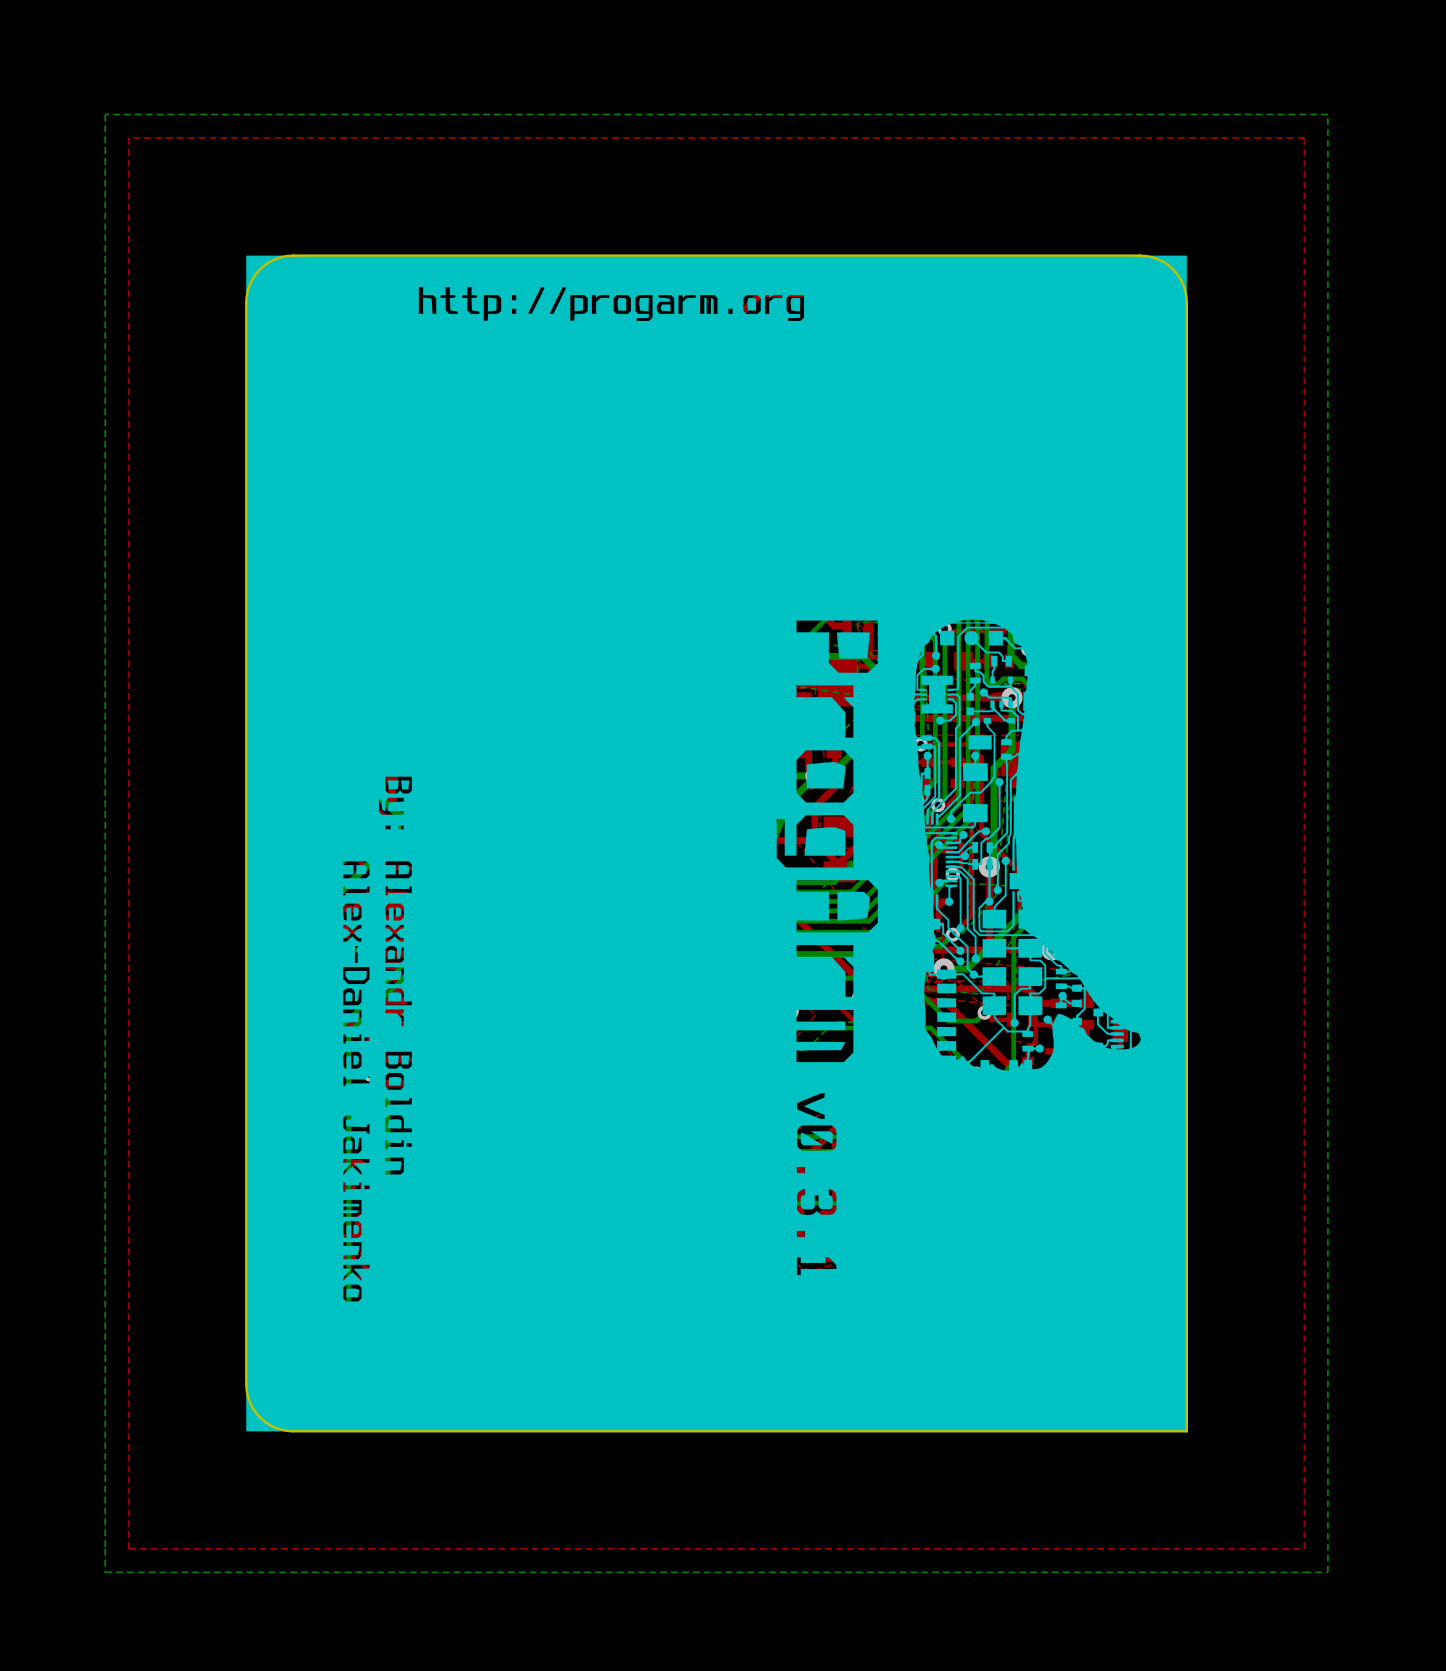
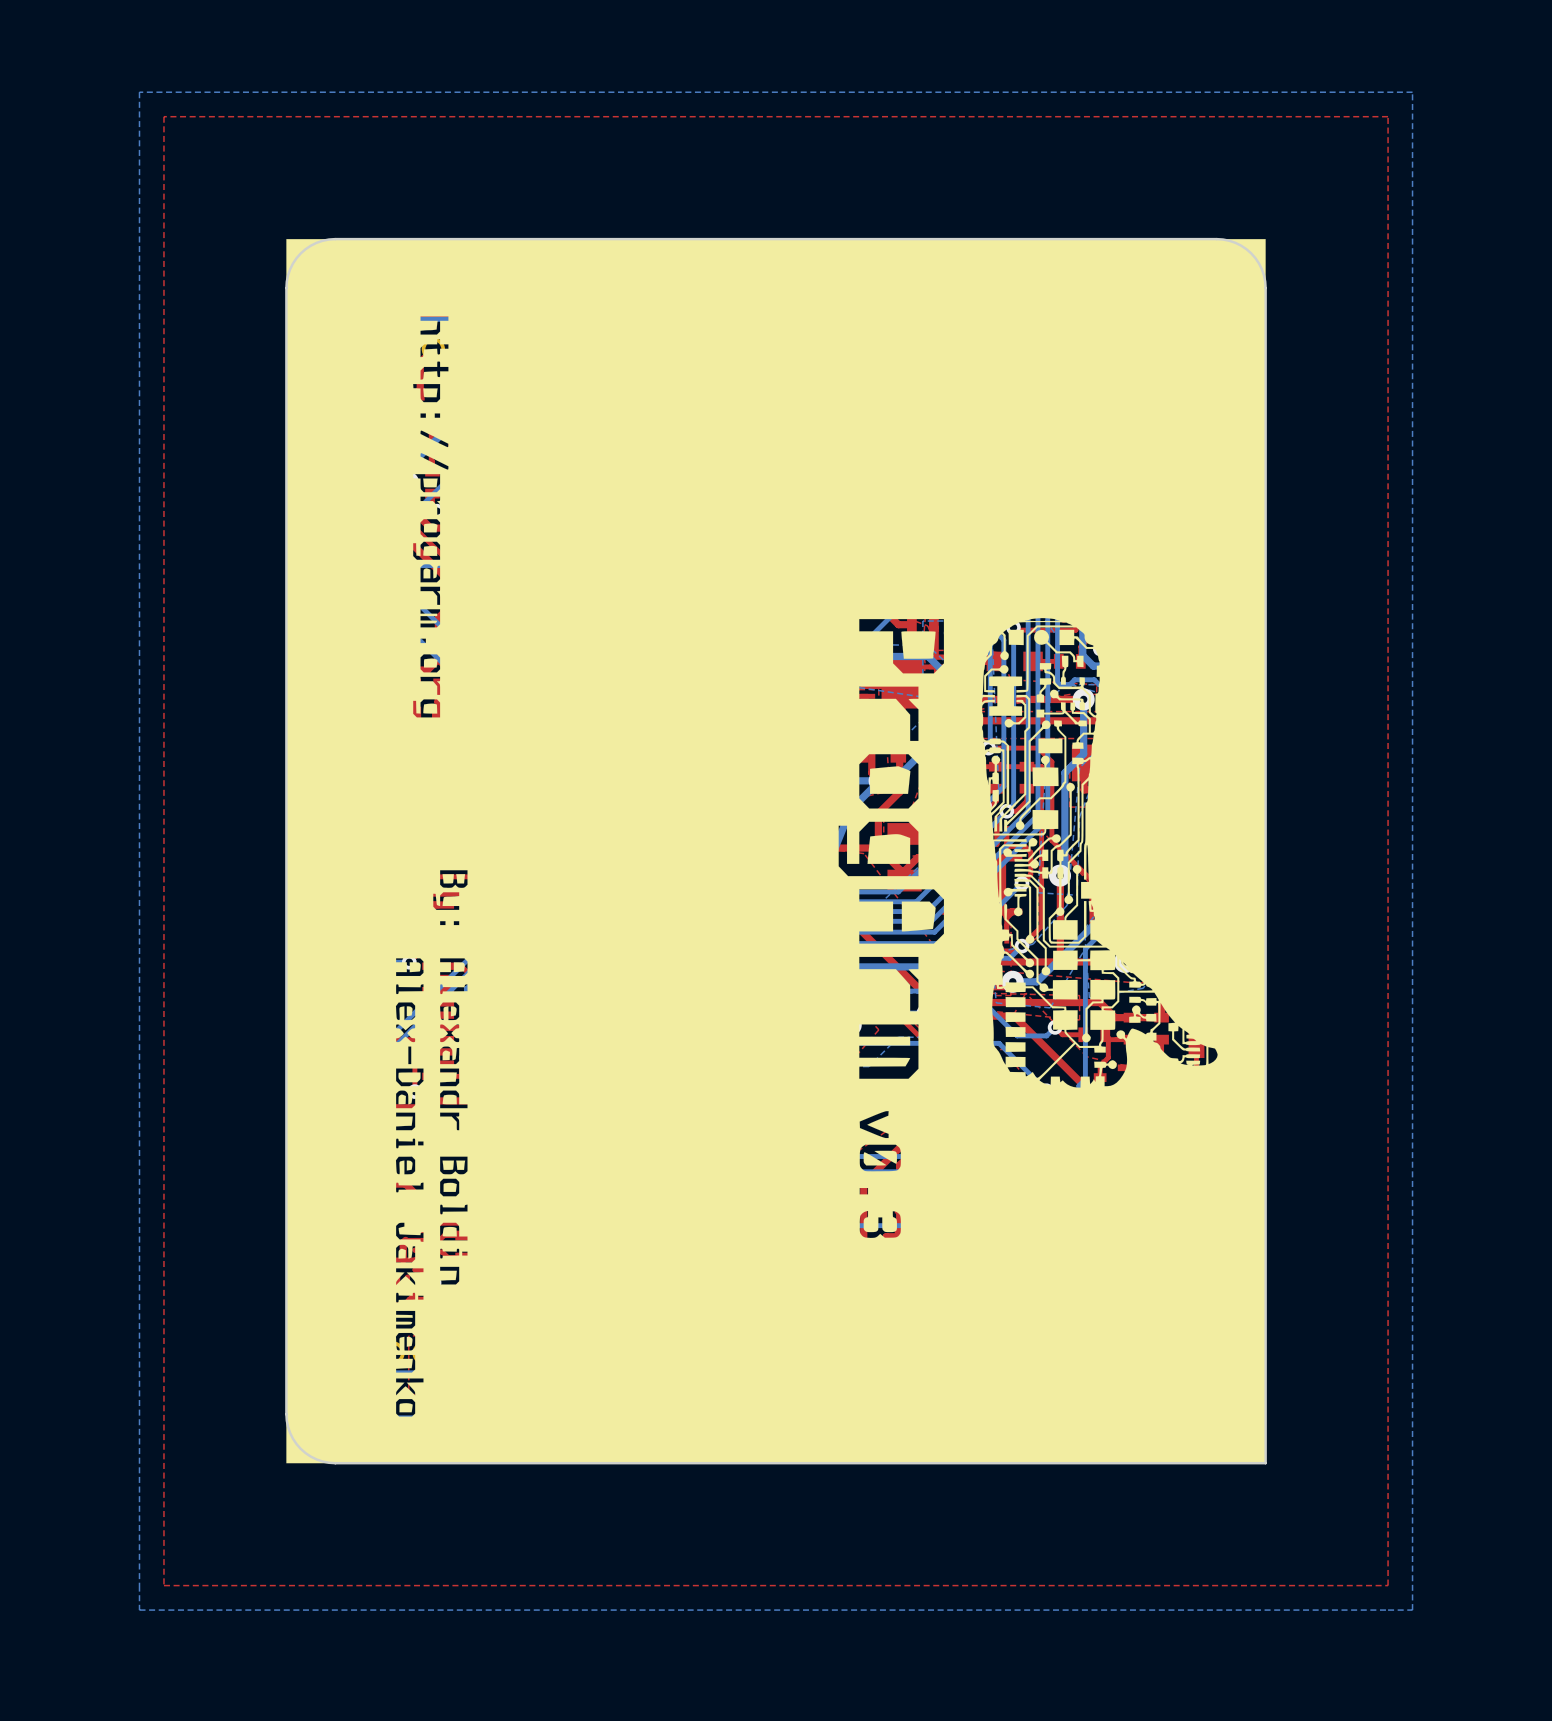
drawing shape: [246, 255, 1187, 1432] -> [286, 239, 1266, 1464]

